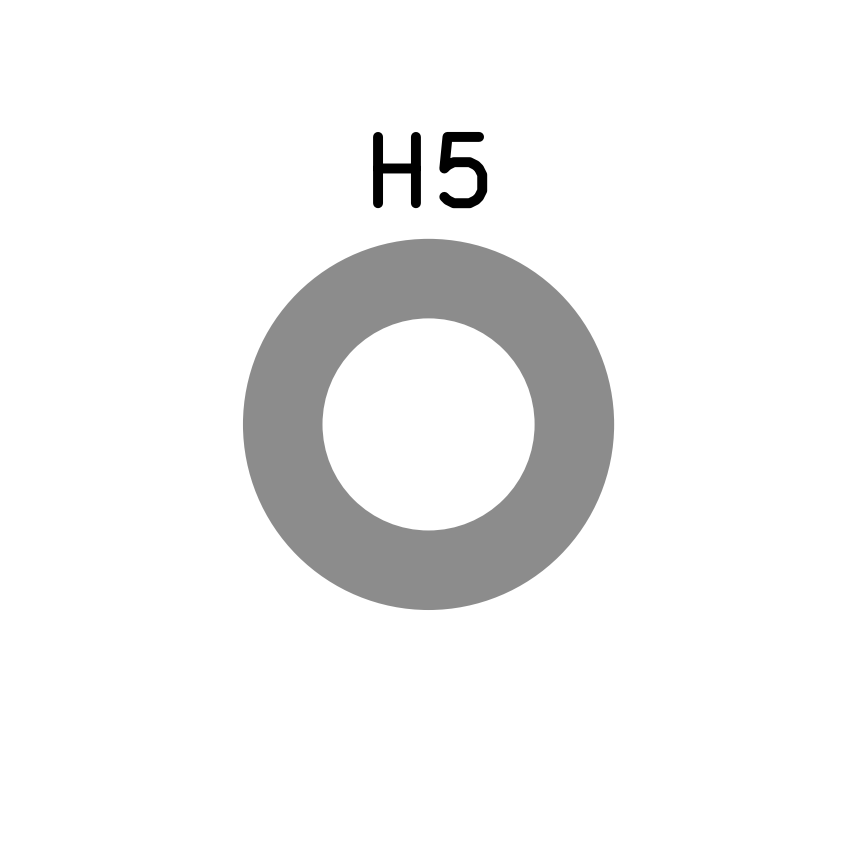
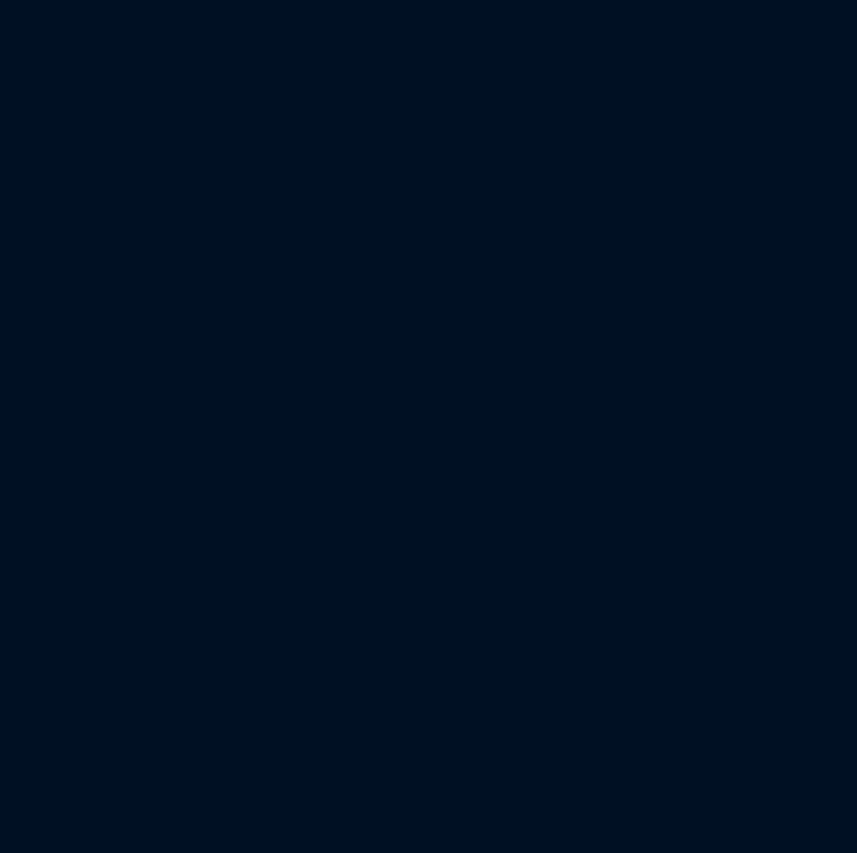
H5: (428, 424) -> none

